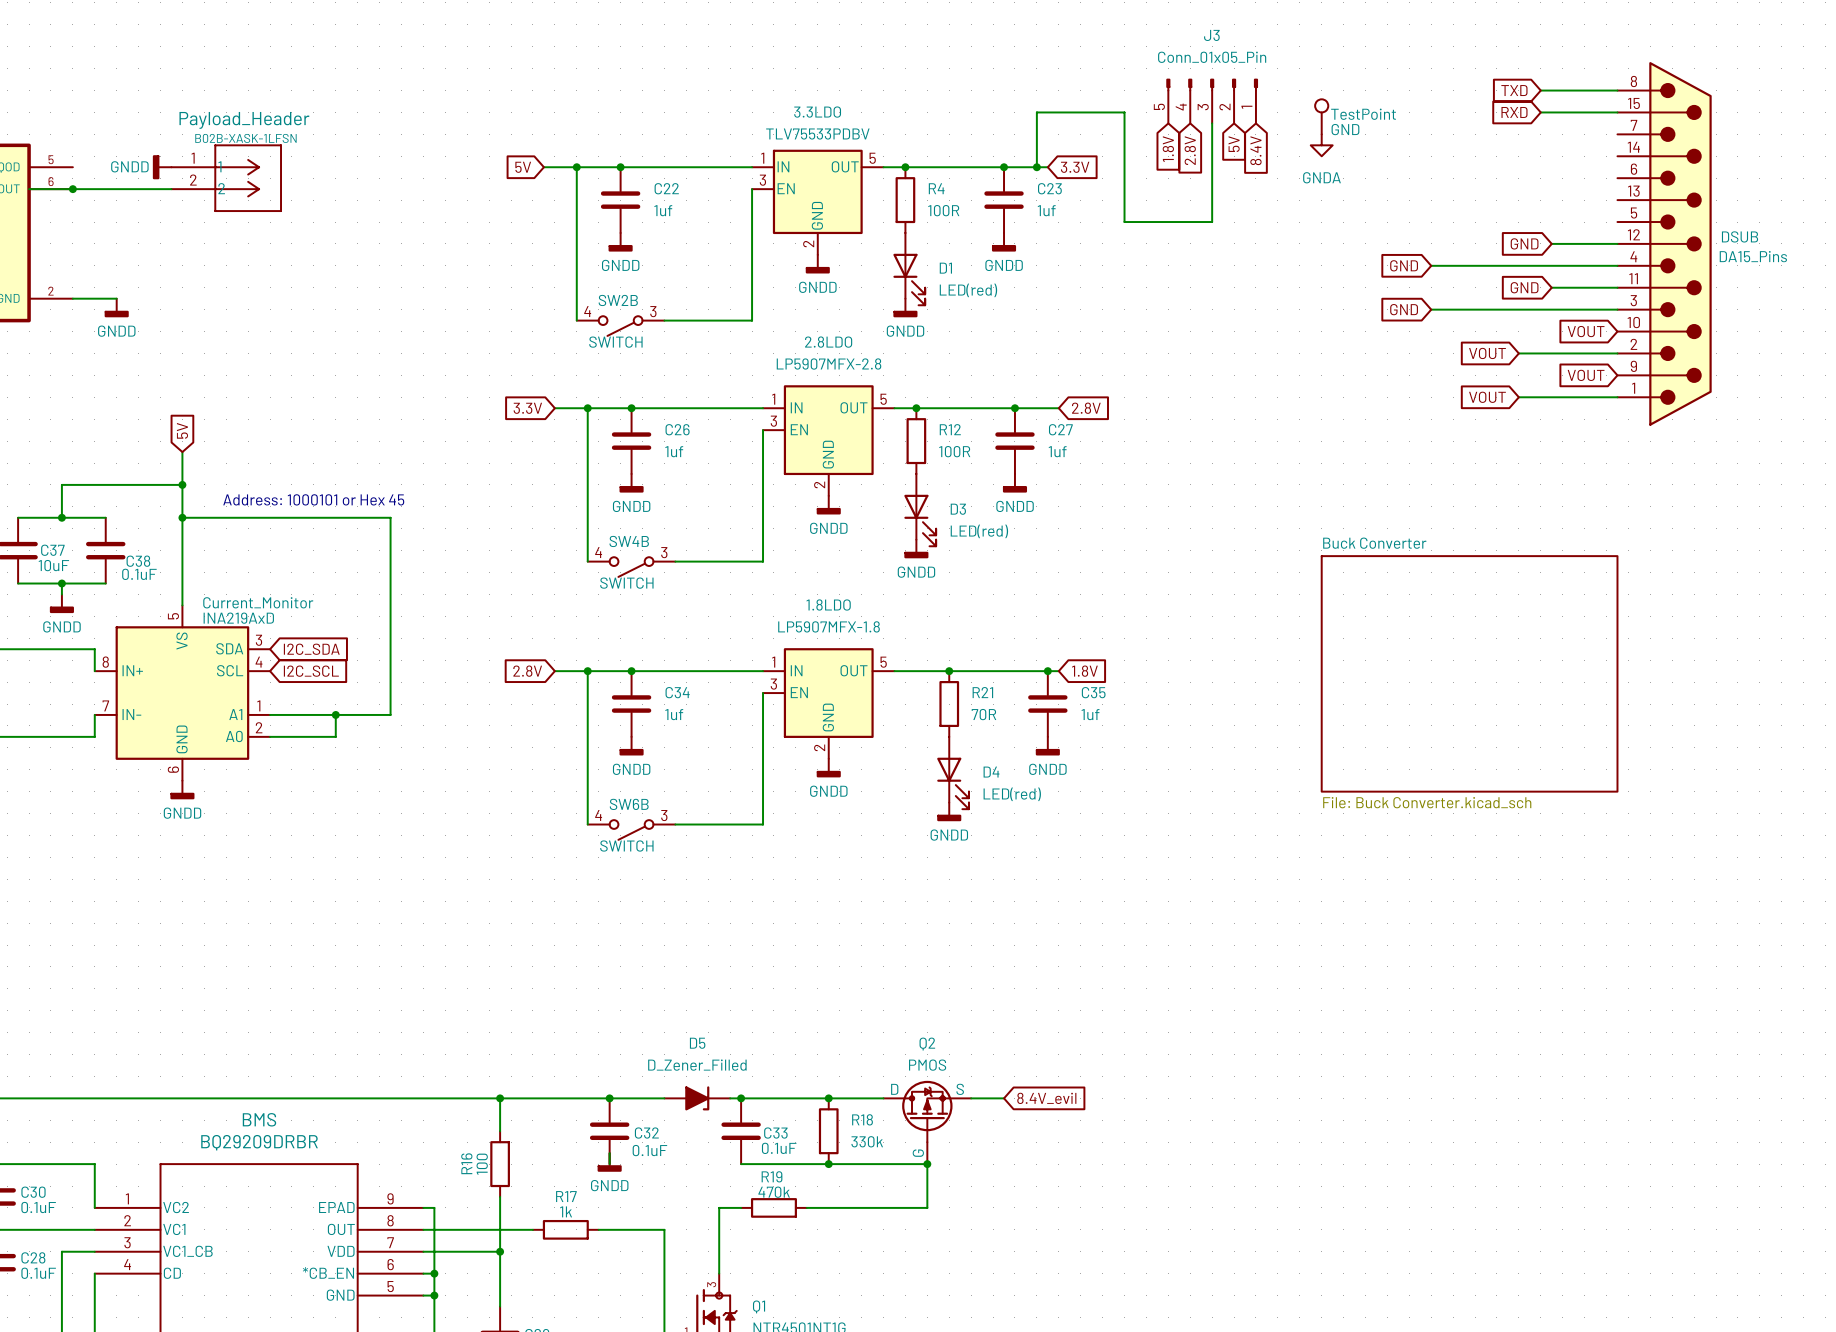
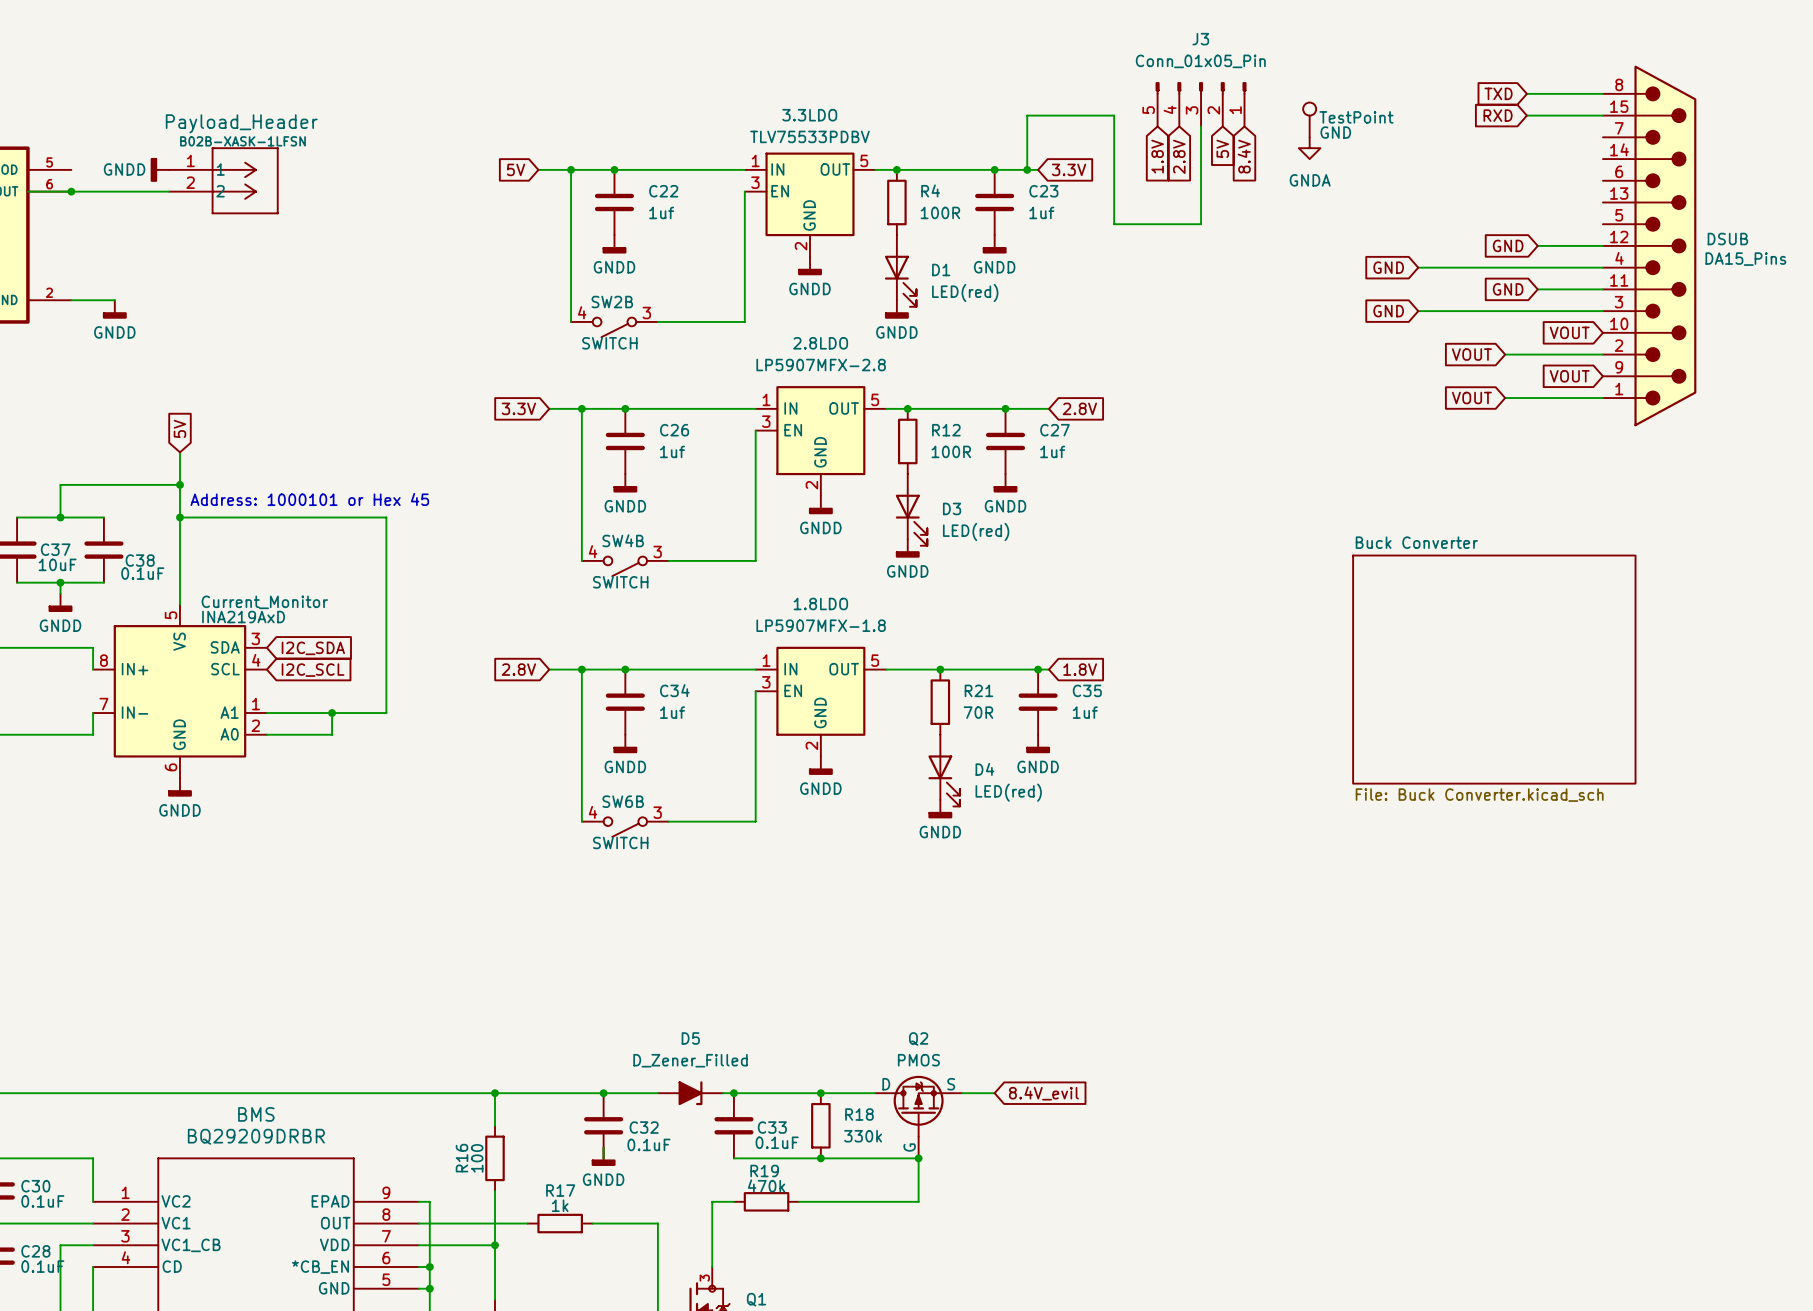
sheet Buck Converter: none -> File: Buck Converter.kicad_sch (1494, 669)
sheet Buck Converter: File: Buck Converter.kicad_sch (1469, 673) -> none

